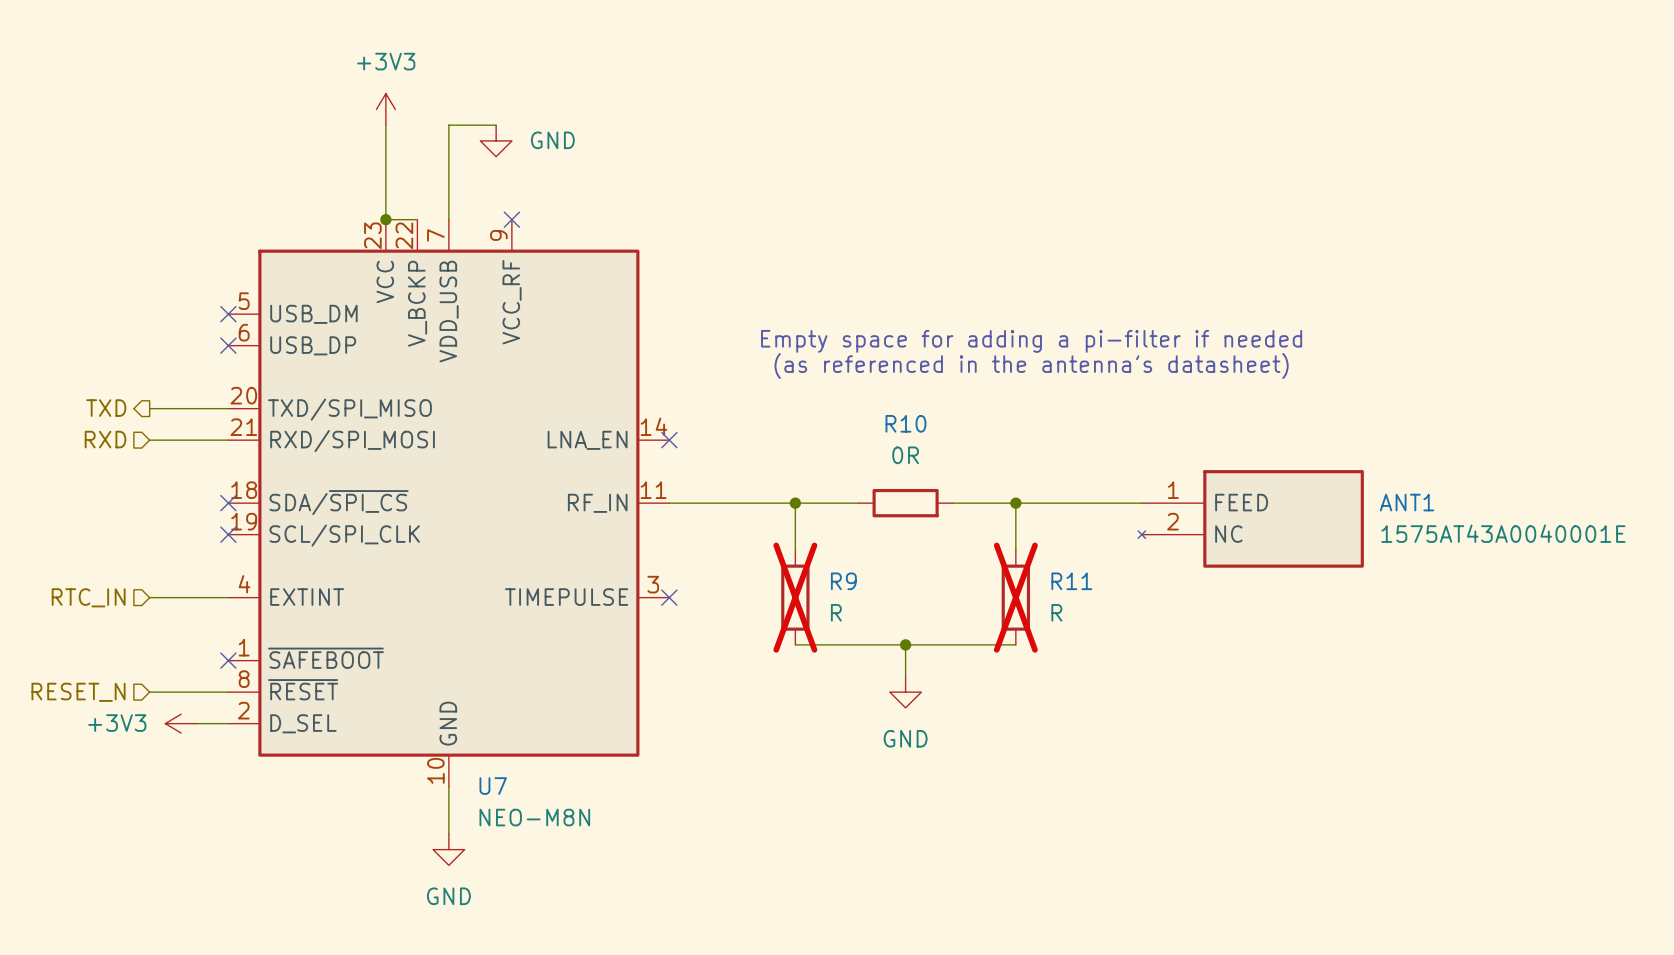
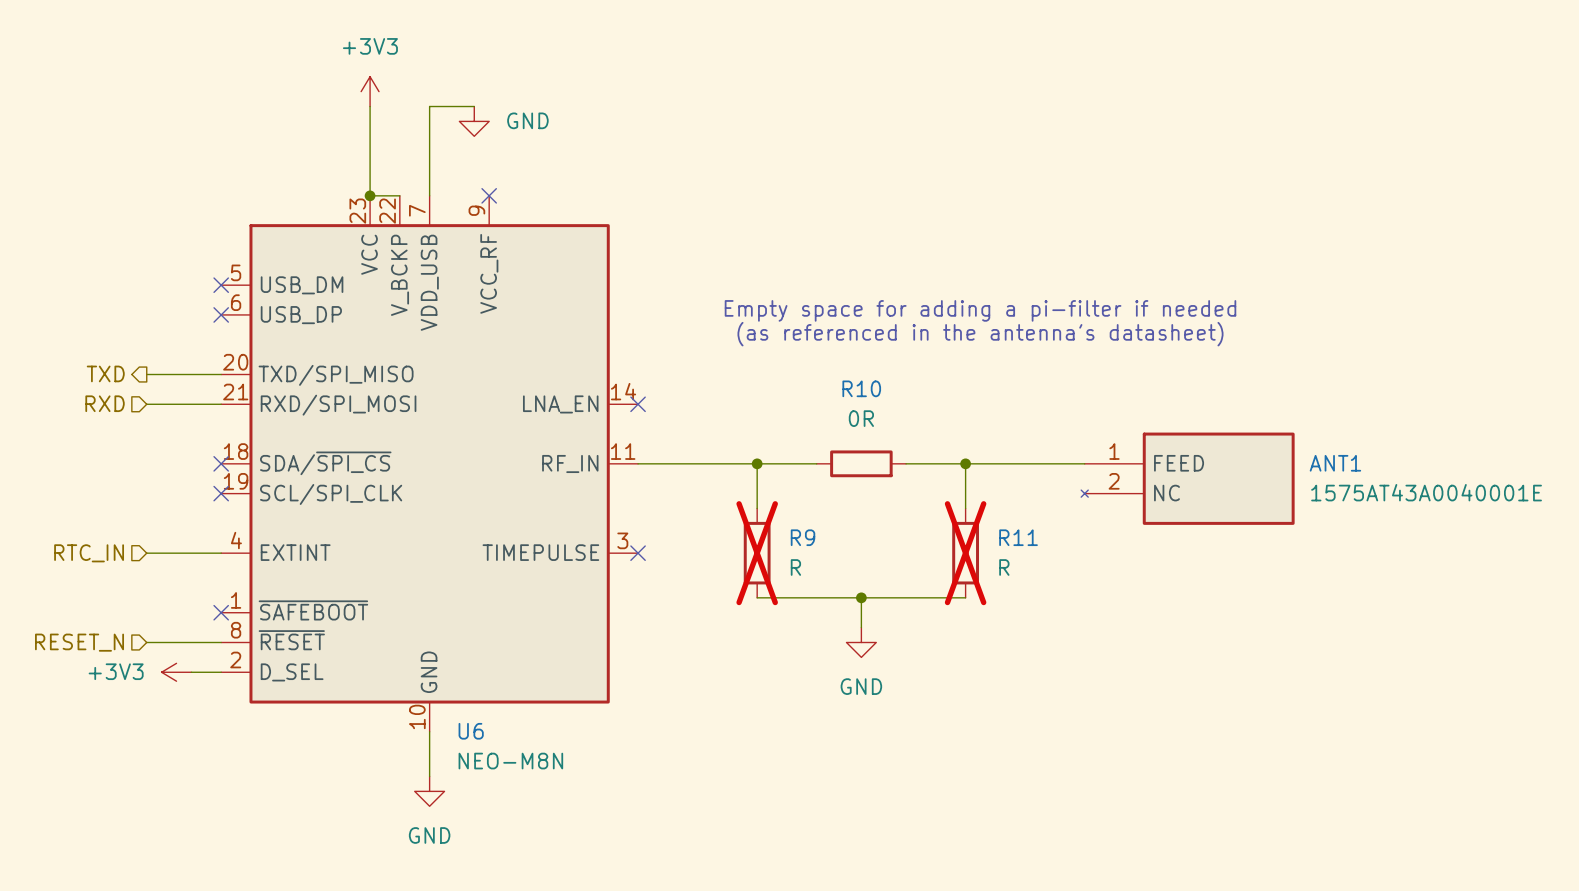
U7 name: U7 (493, 786) -> U6 (471, 731)

